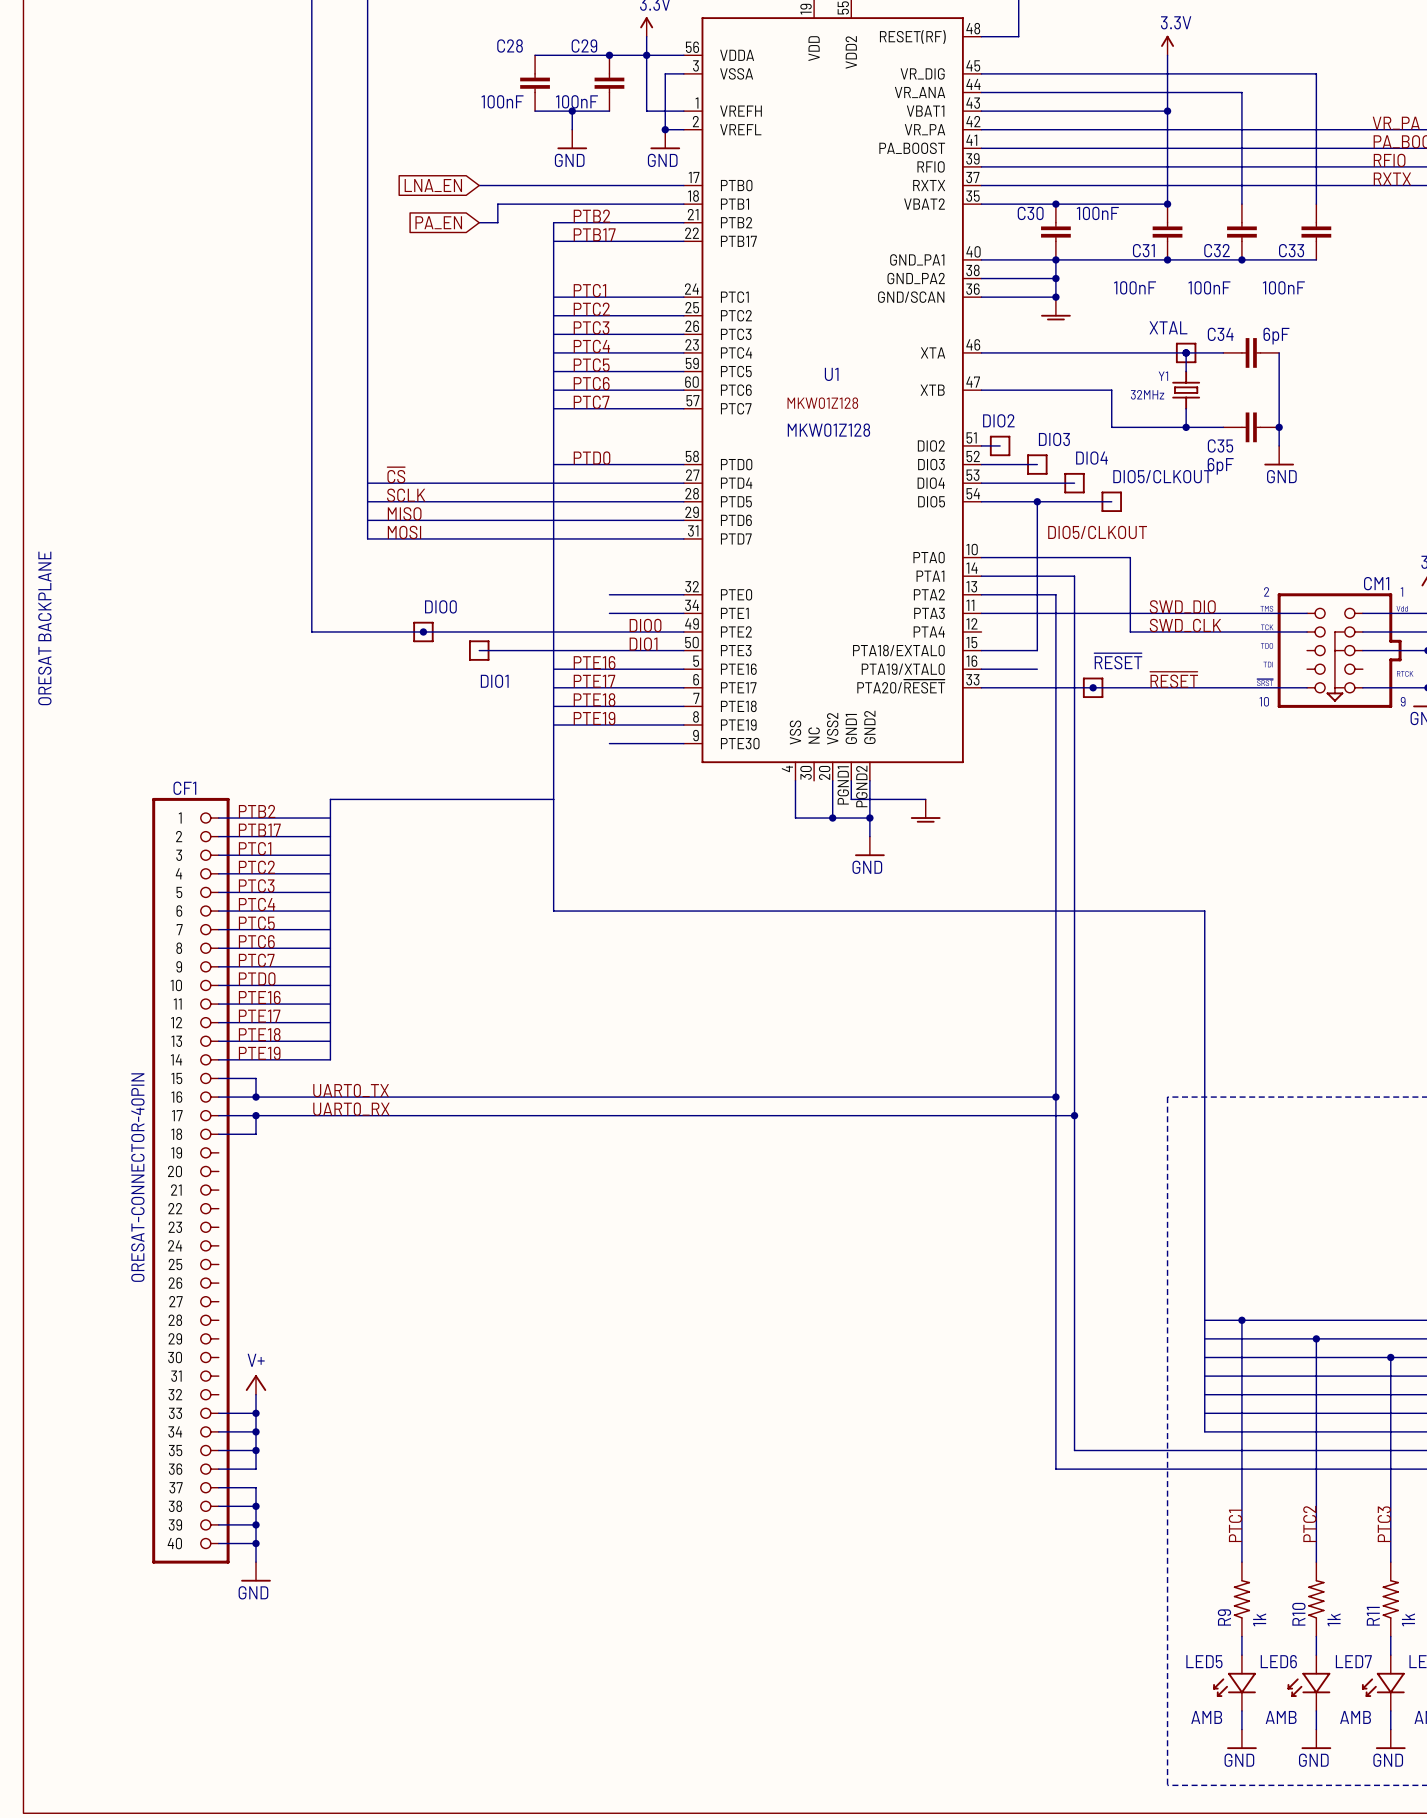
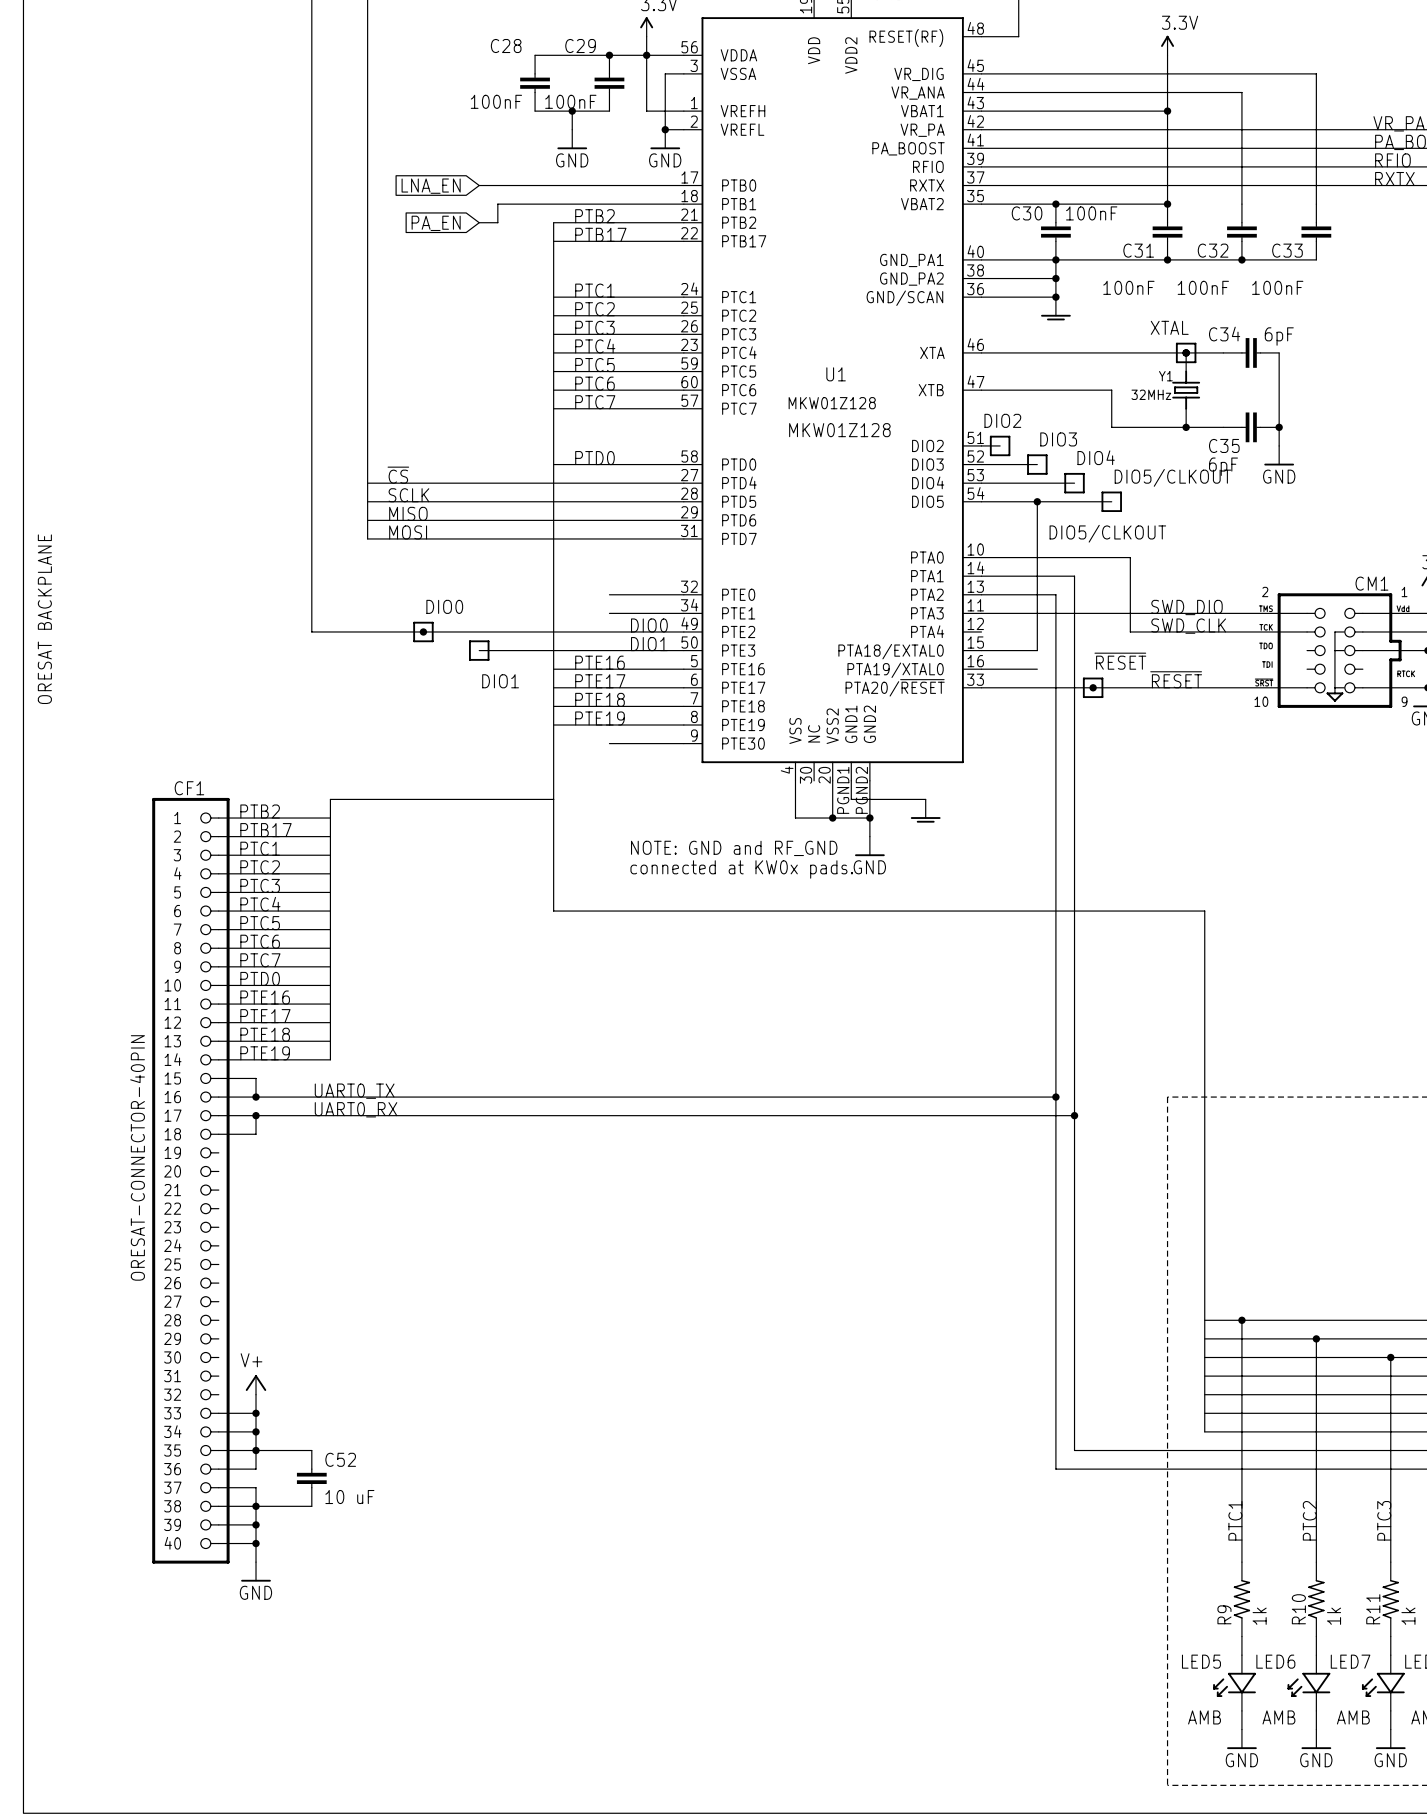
text: none -> NOTE: GND and RF_GND (734, 848)
text: none -> connected at KW0x pads. (741, 869)
wire: none -> (256, 1450) (311, 1450)
C52: none -> 10 uF (311, 1478)
wire: none -> (256, 1506) (311, 1506)

